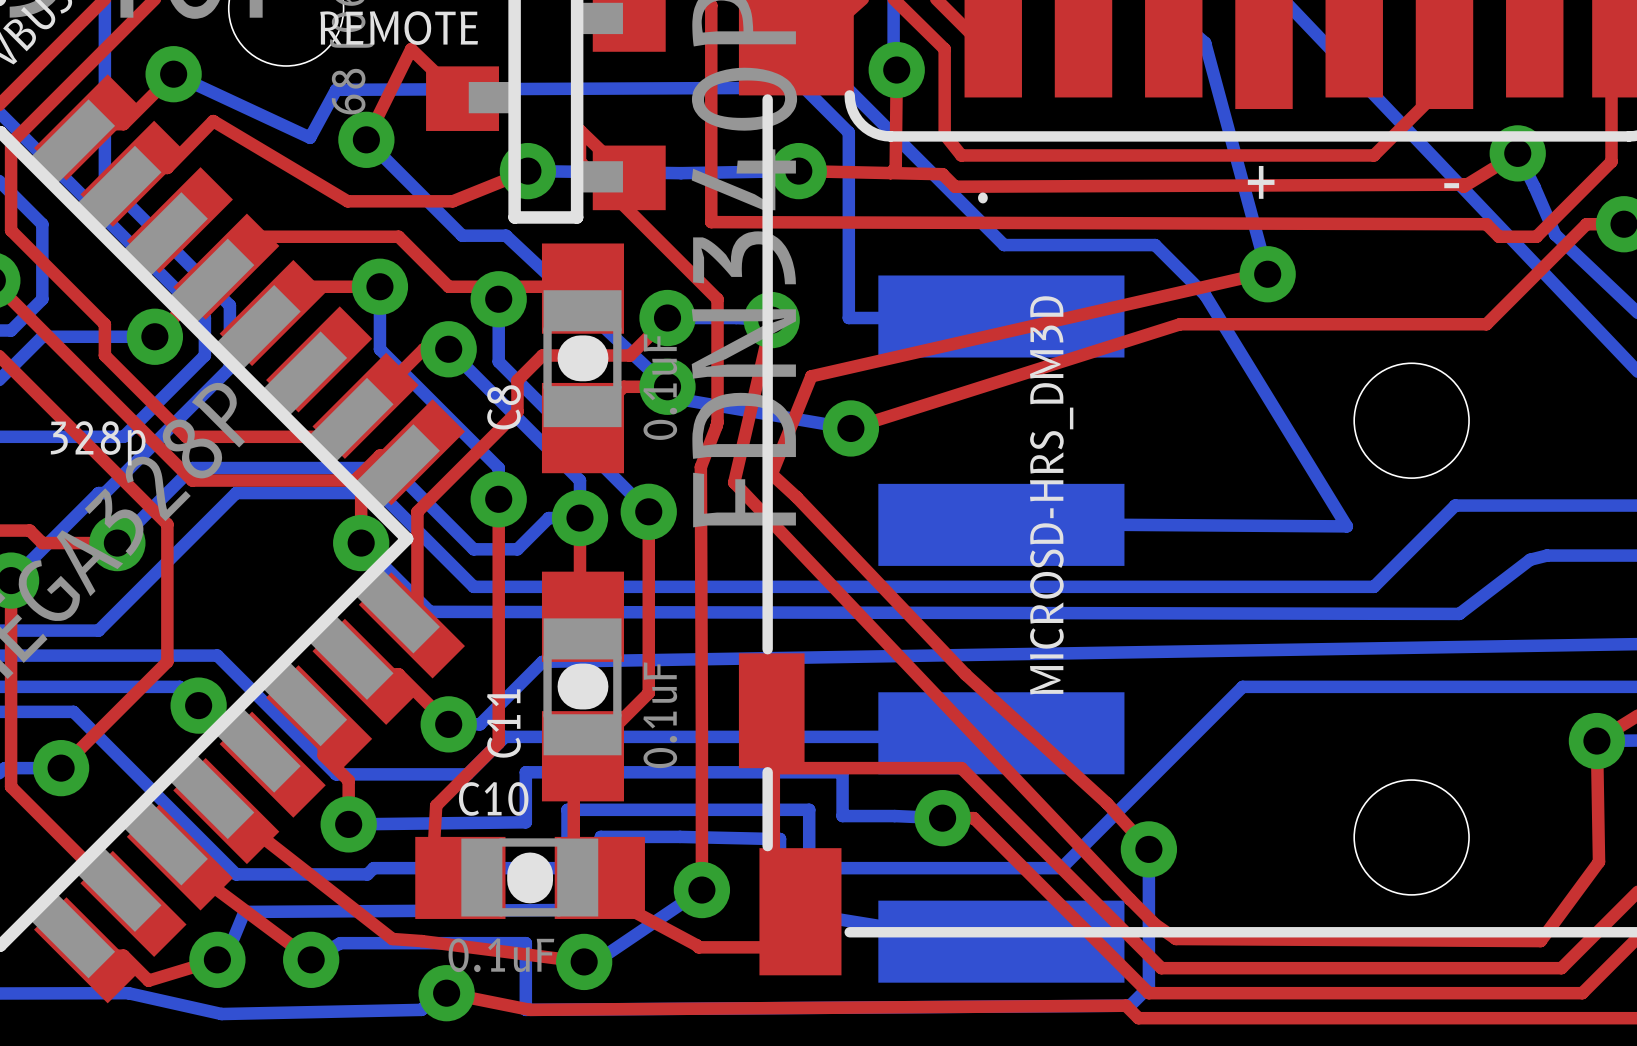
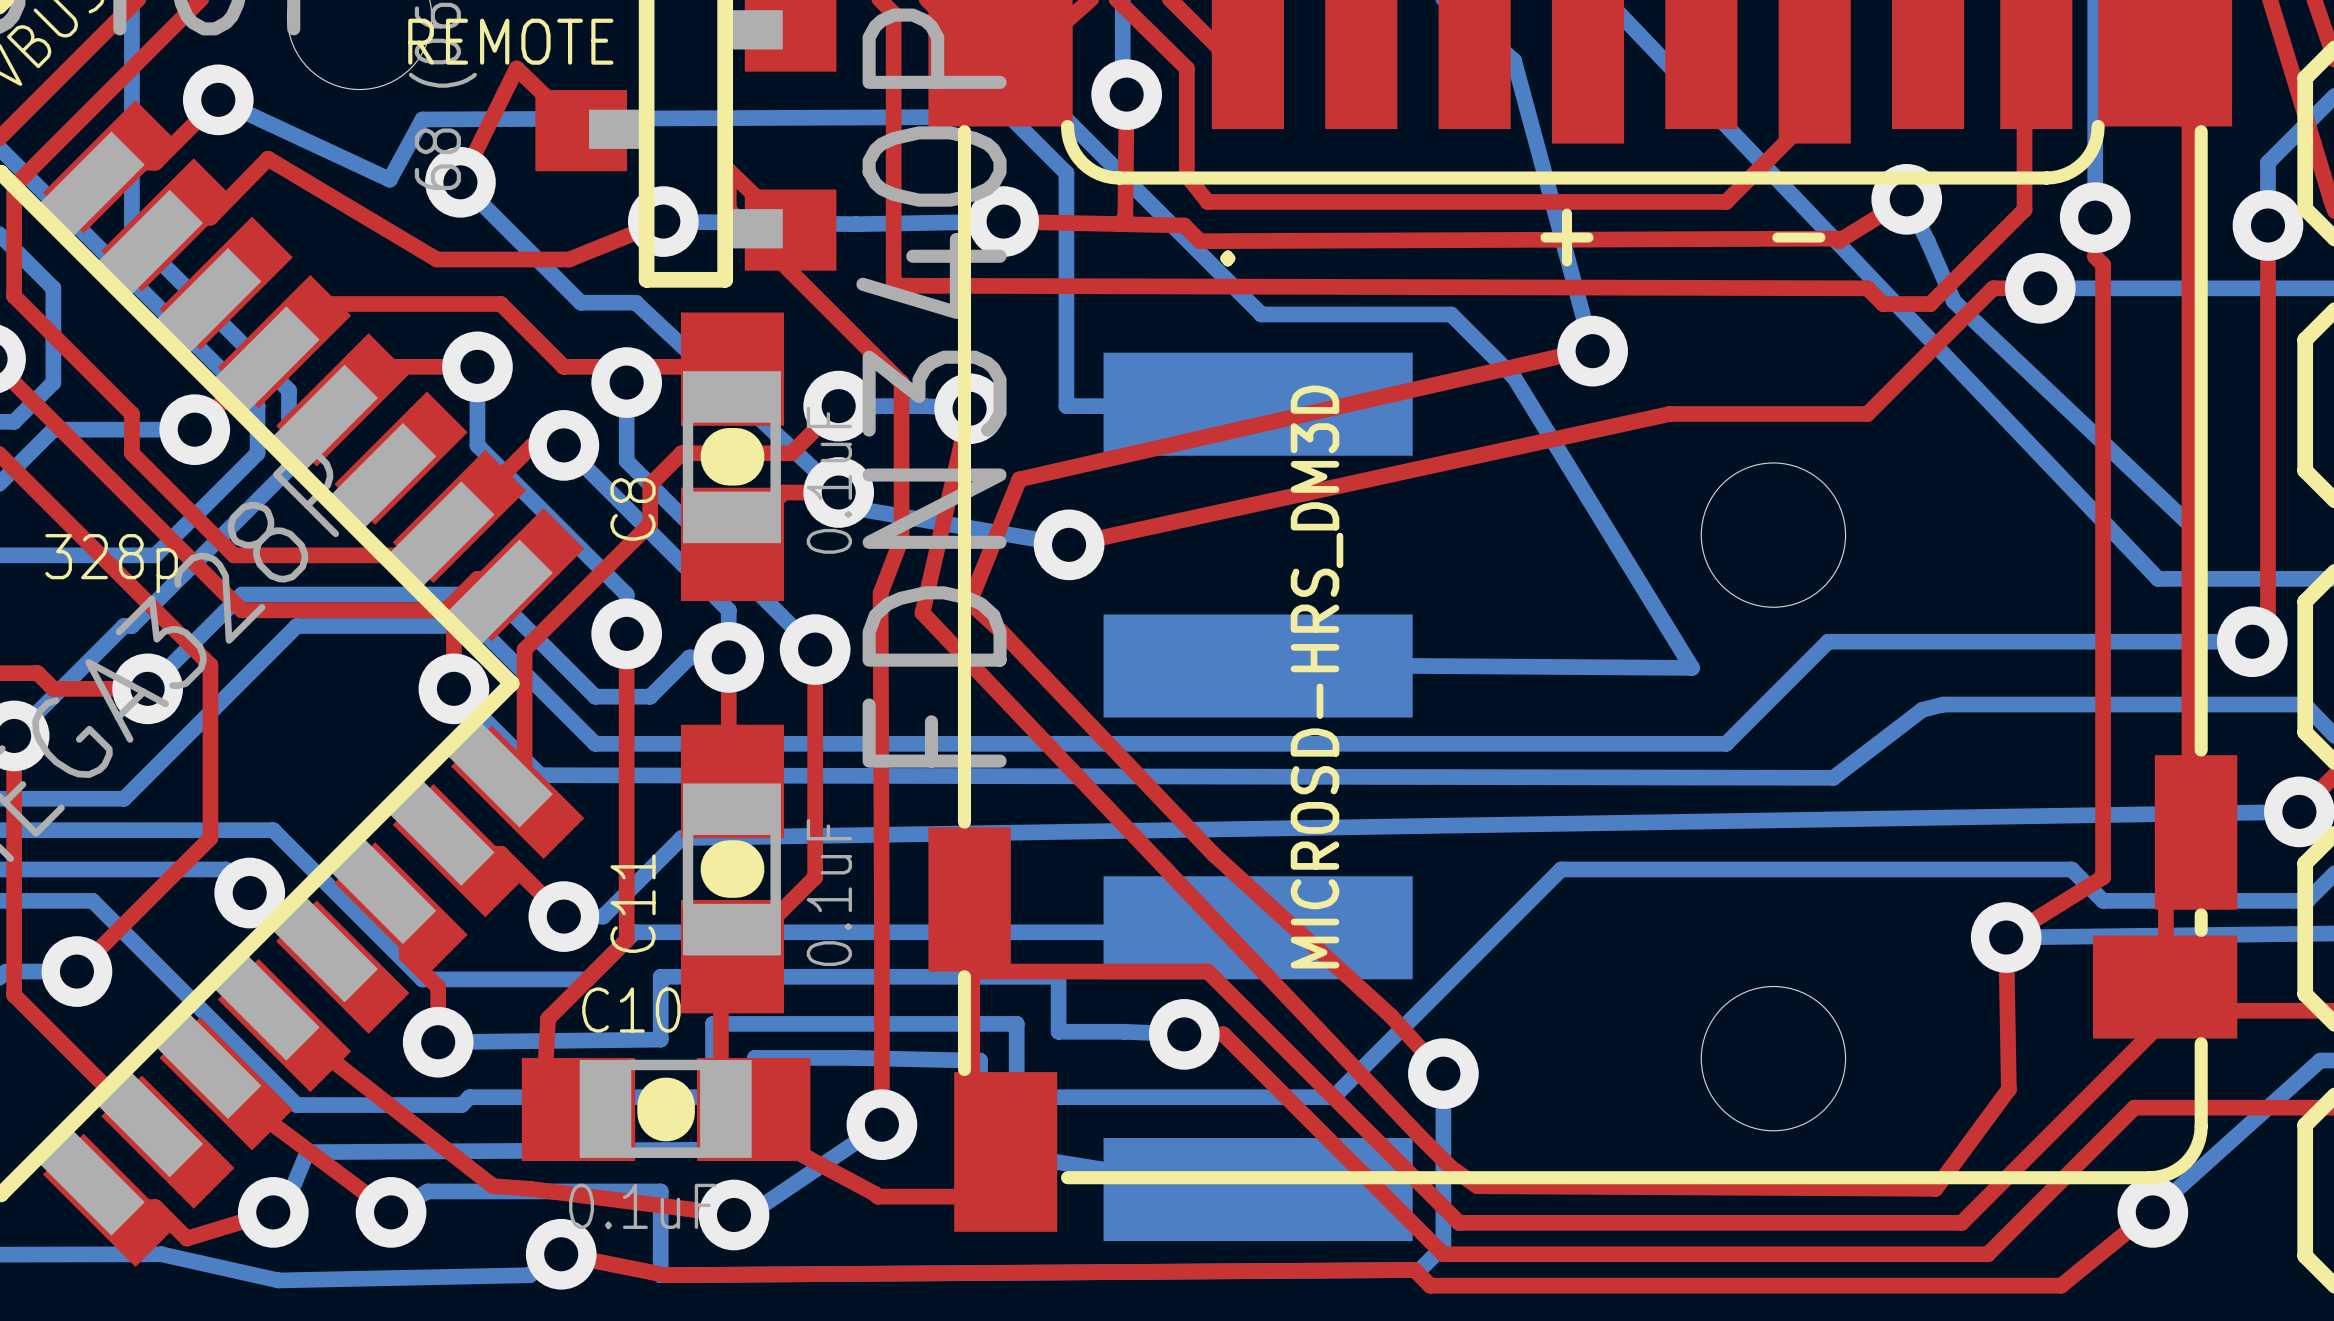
top track: (1329, 324) (1180, 324) (850, 428) -> (1669, 413) (1069, 544)

